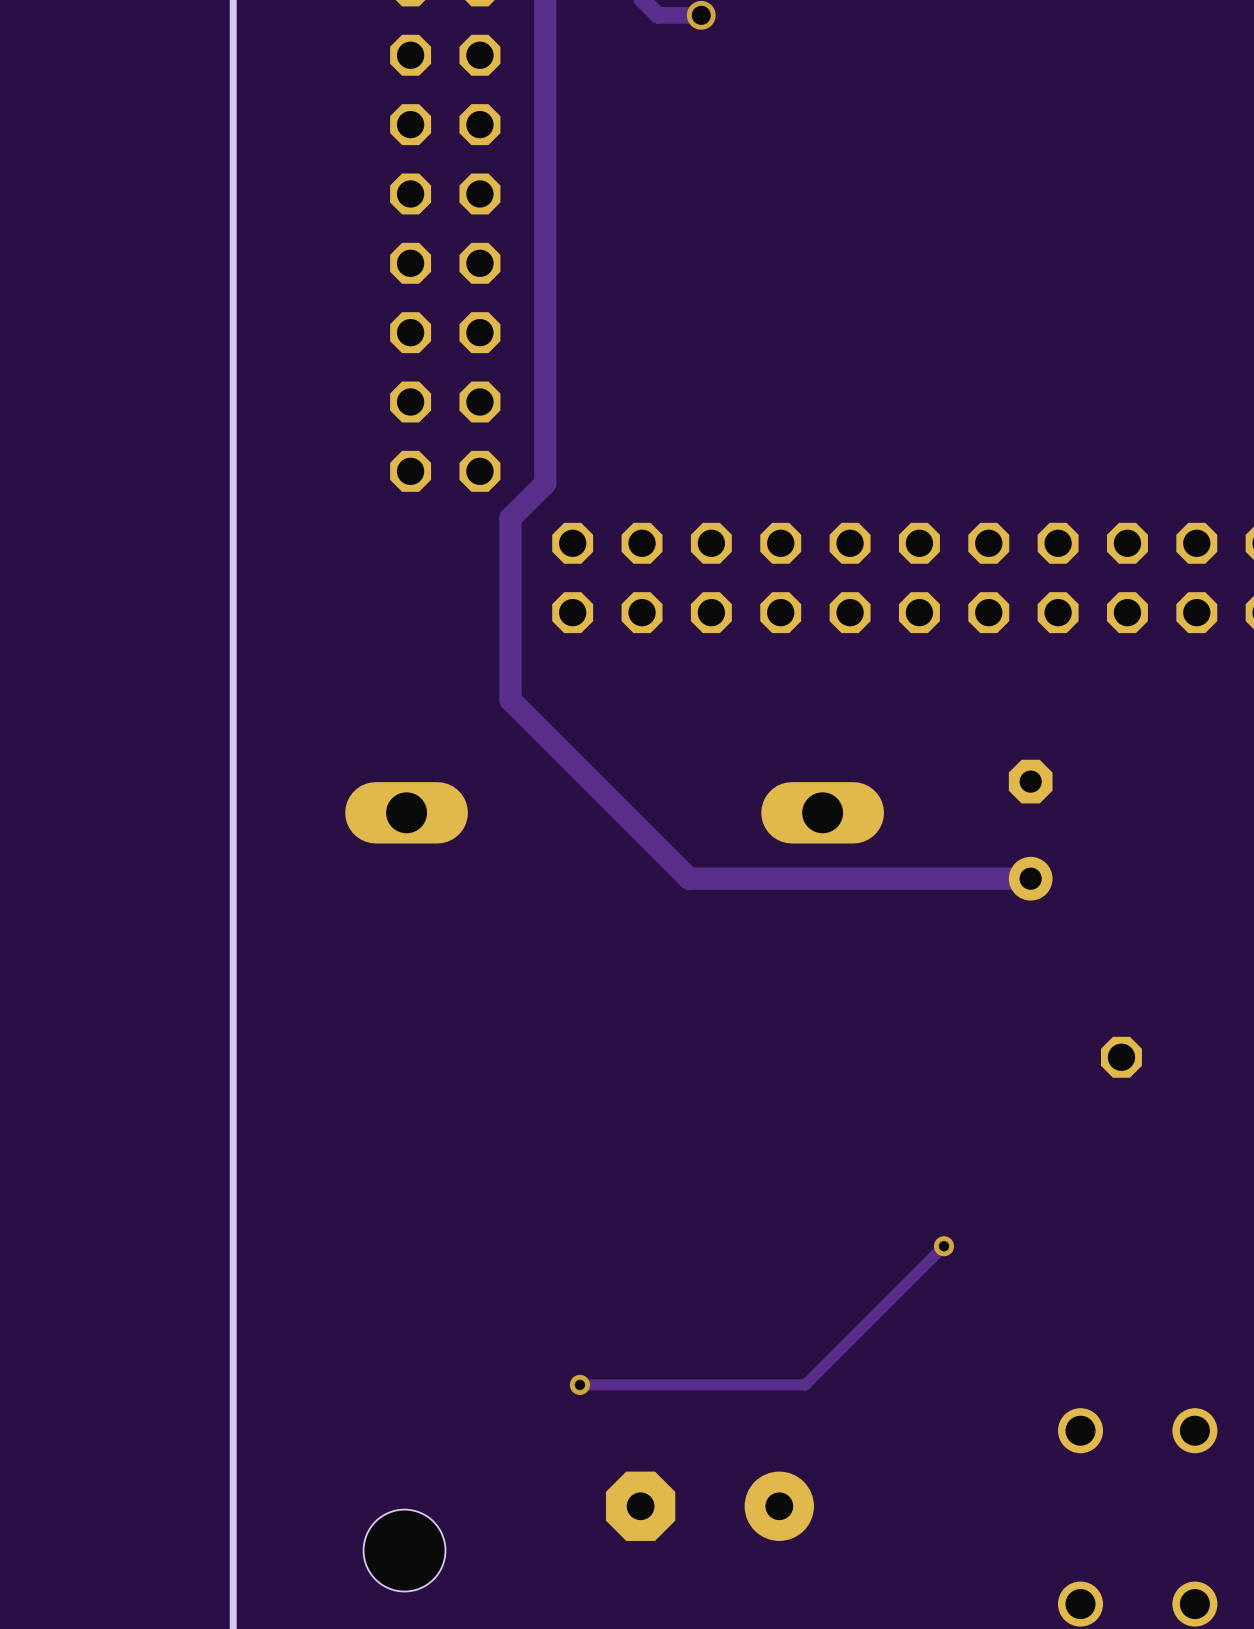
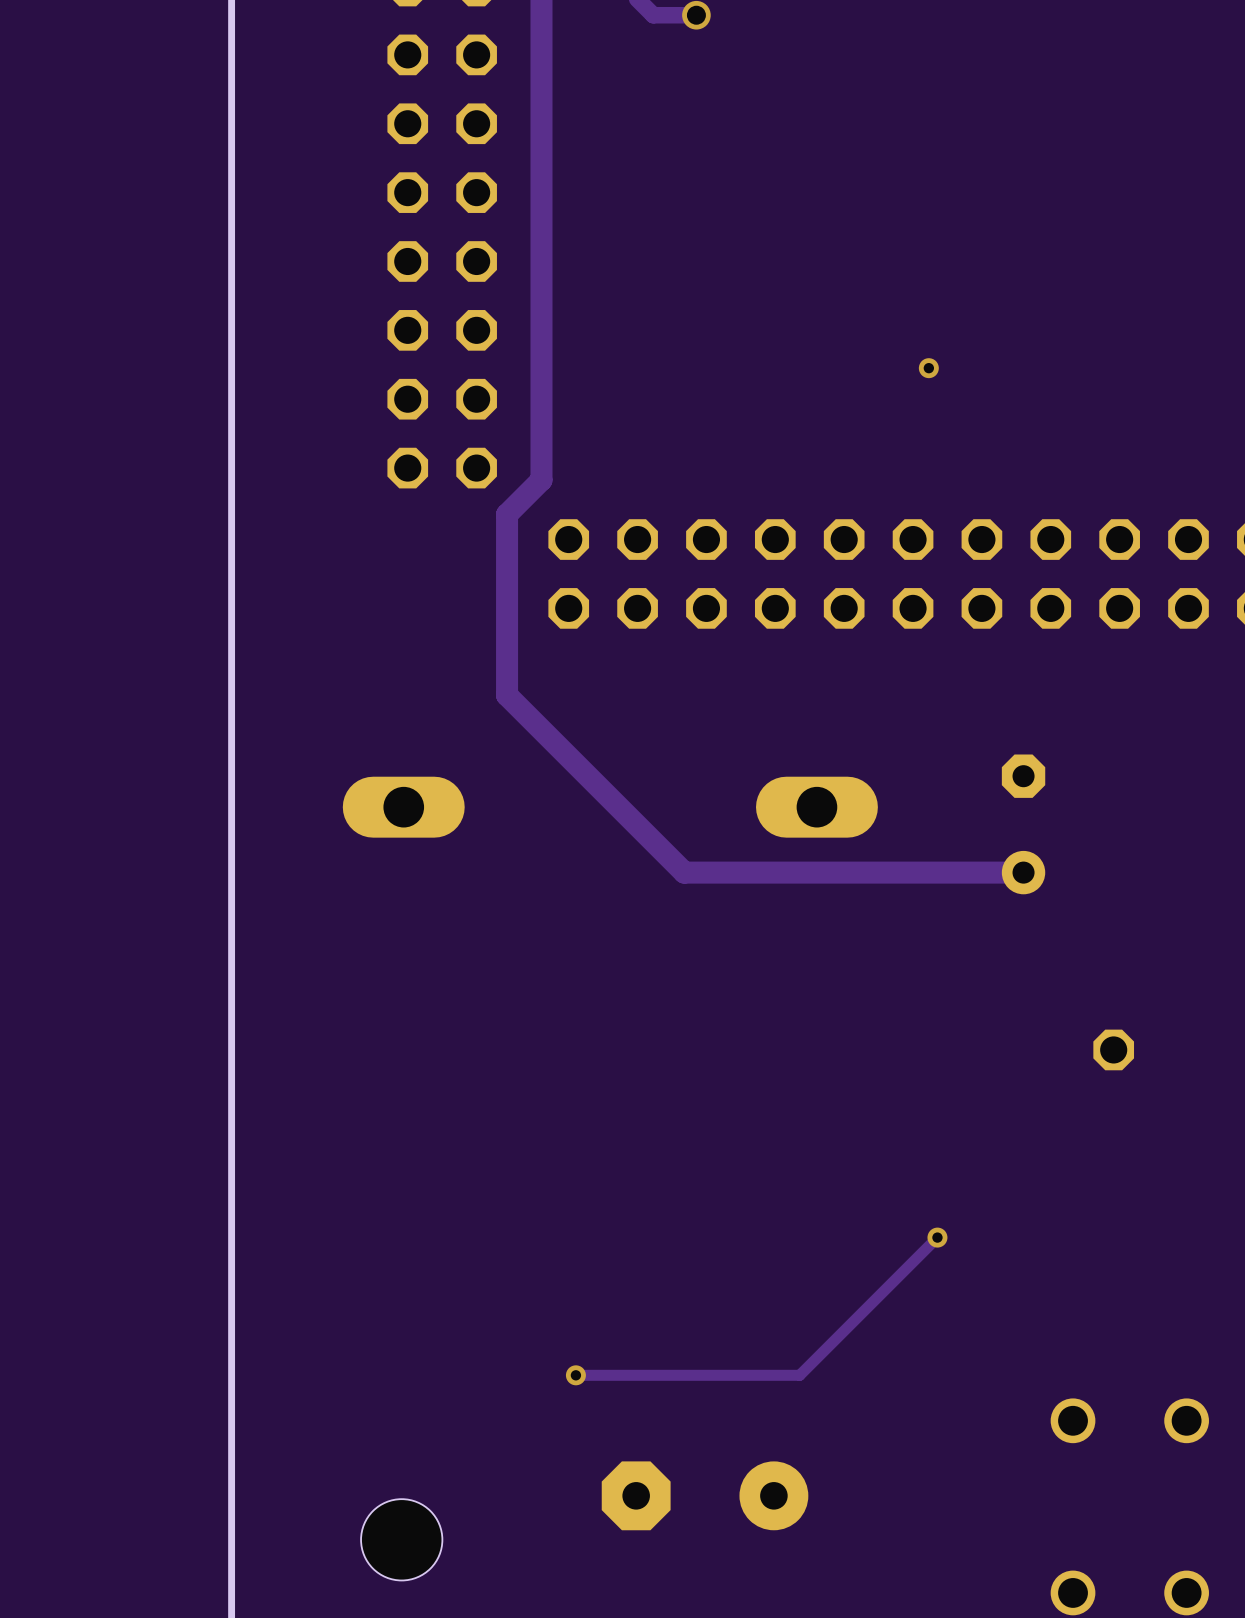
via: none -> (928, 368)

